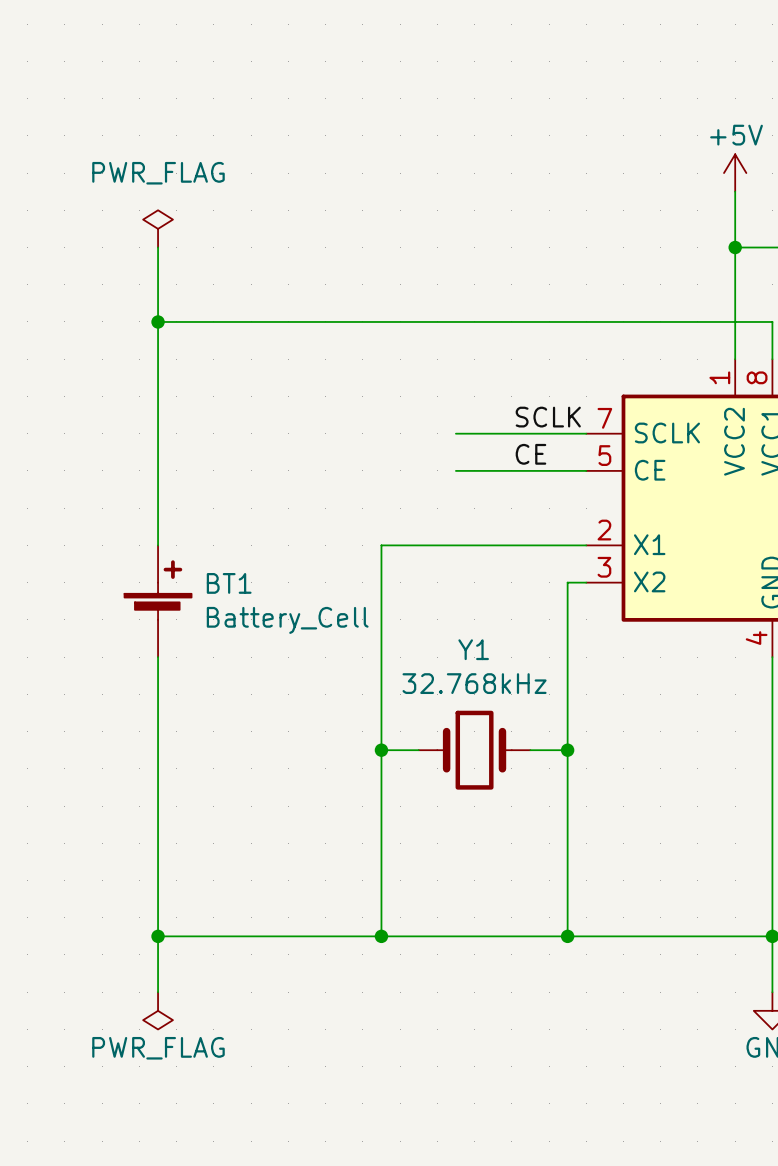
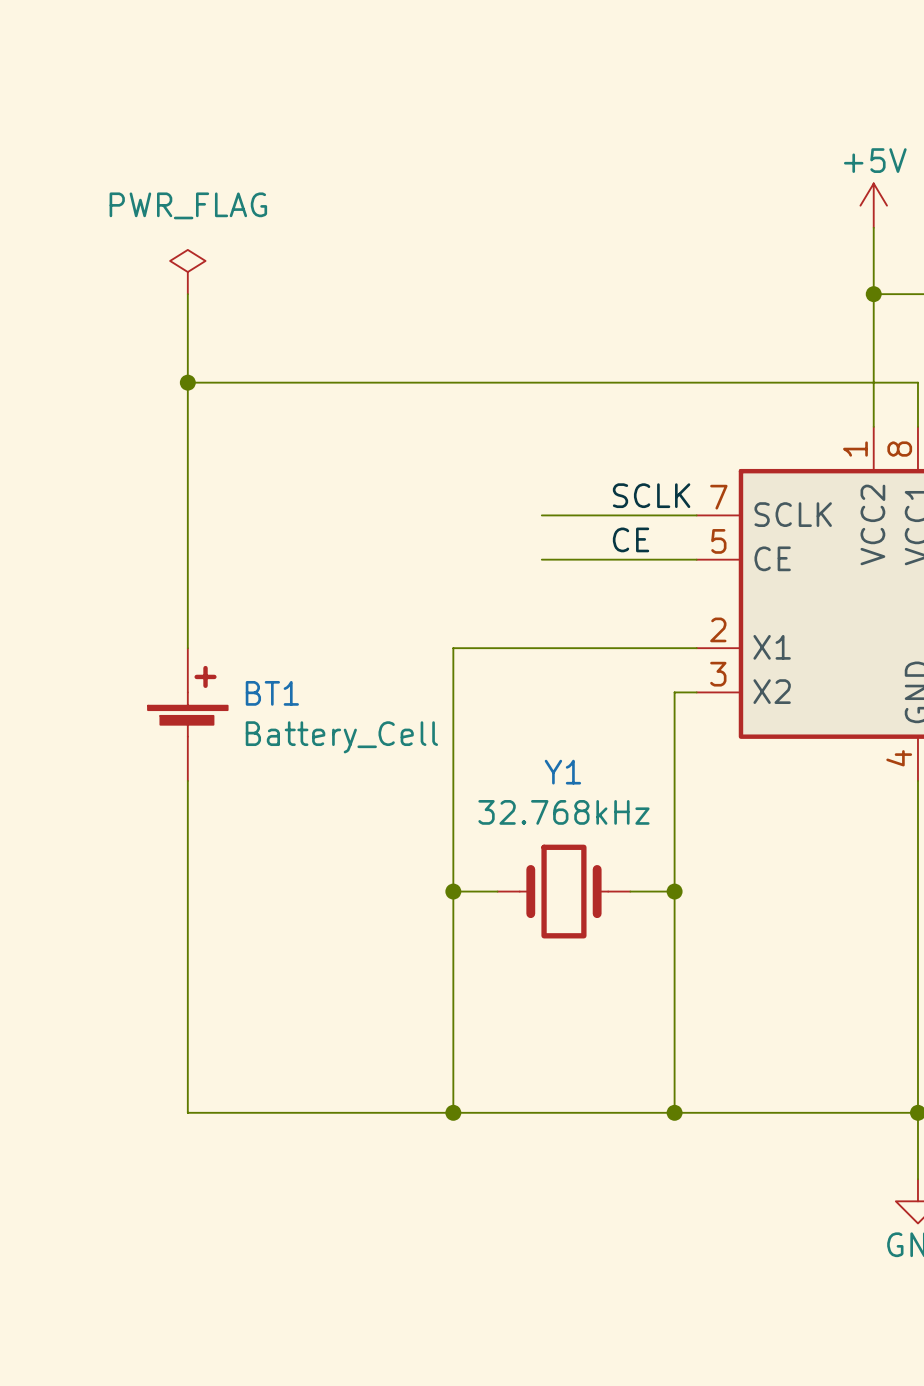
wire: (158, 936) (158, 992) -> none
junction: (158, 936) -> none
power symbol: PWR_FLAG (158, 1010) -> none

